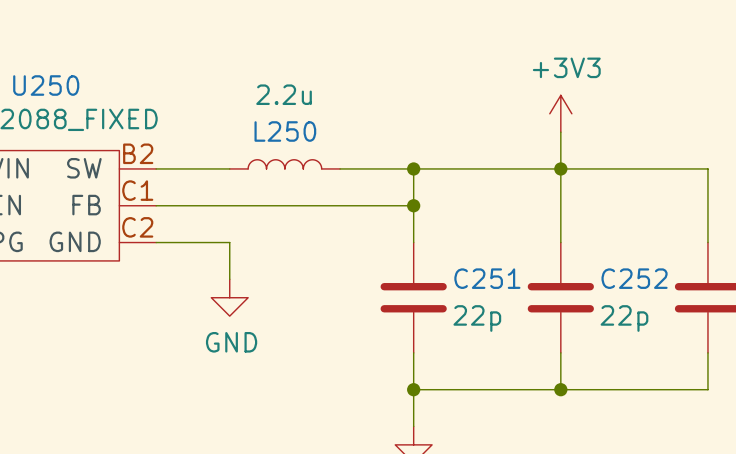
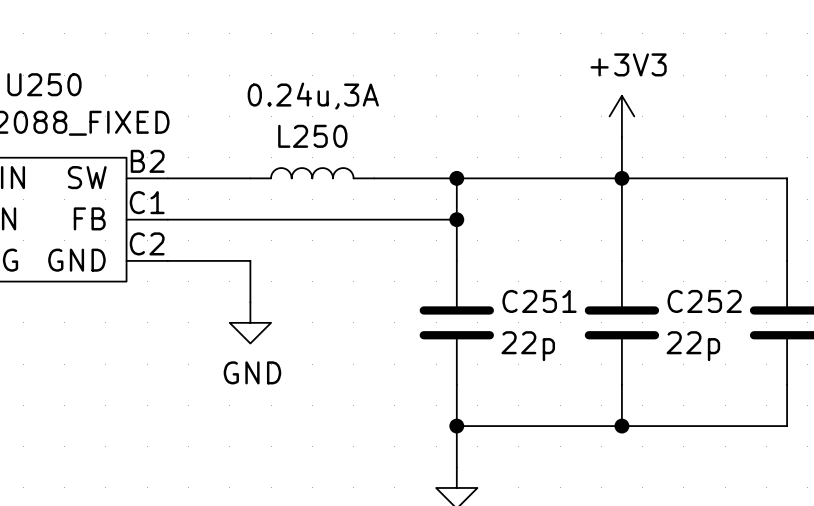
L250 value: 2.2u (284, 94) -> 0.24u,3A (313, 96)

